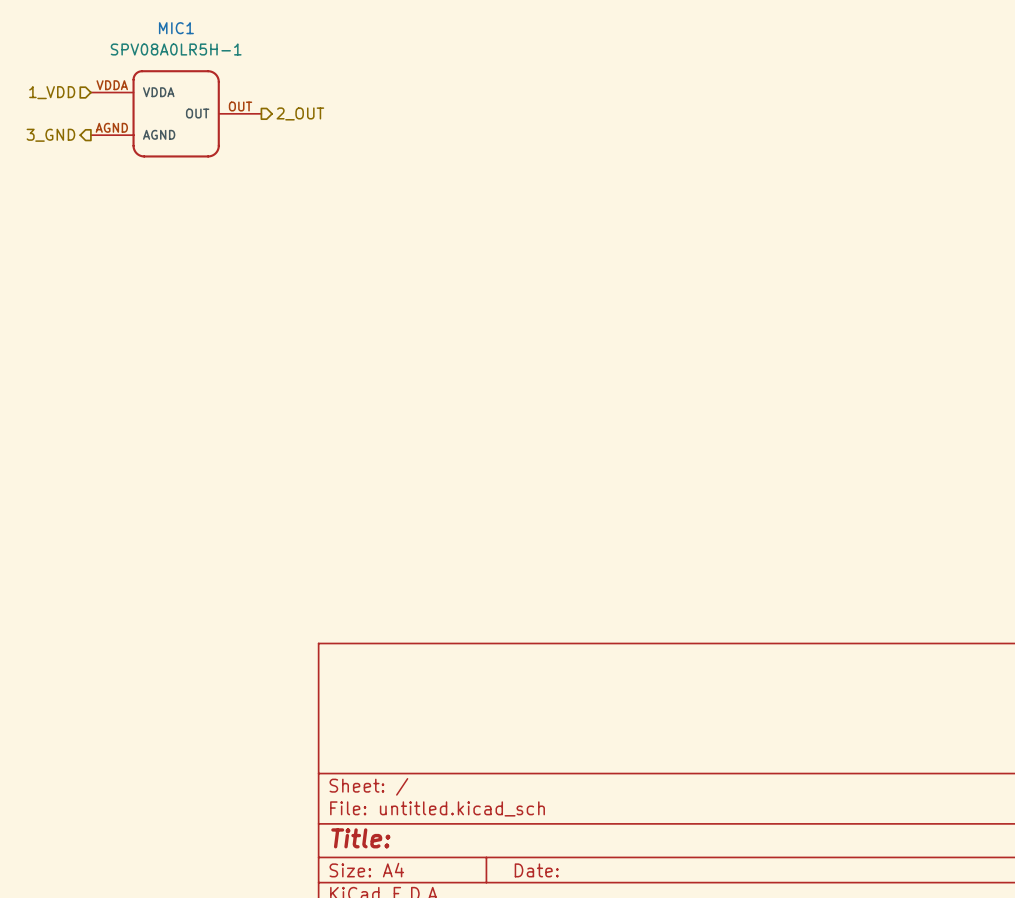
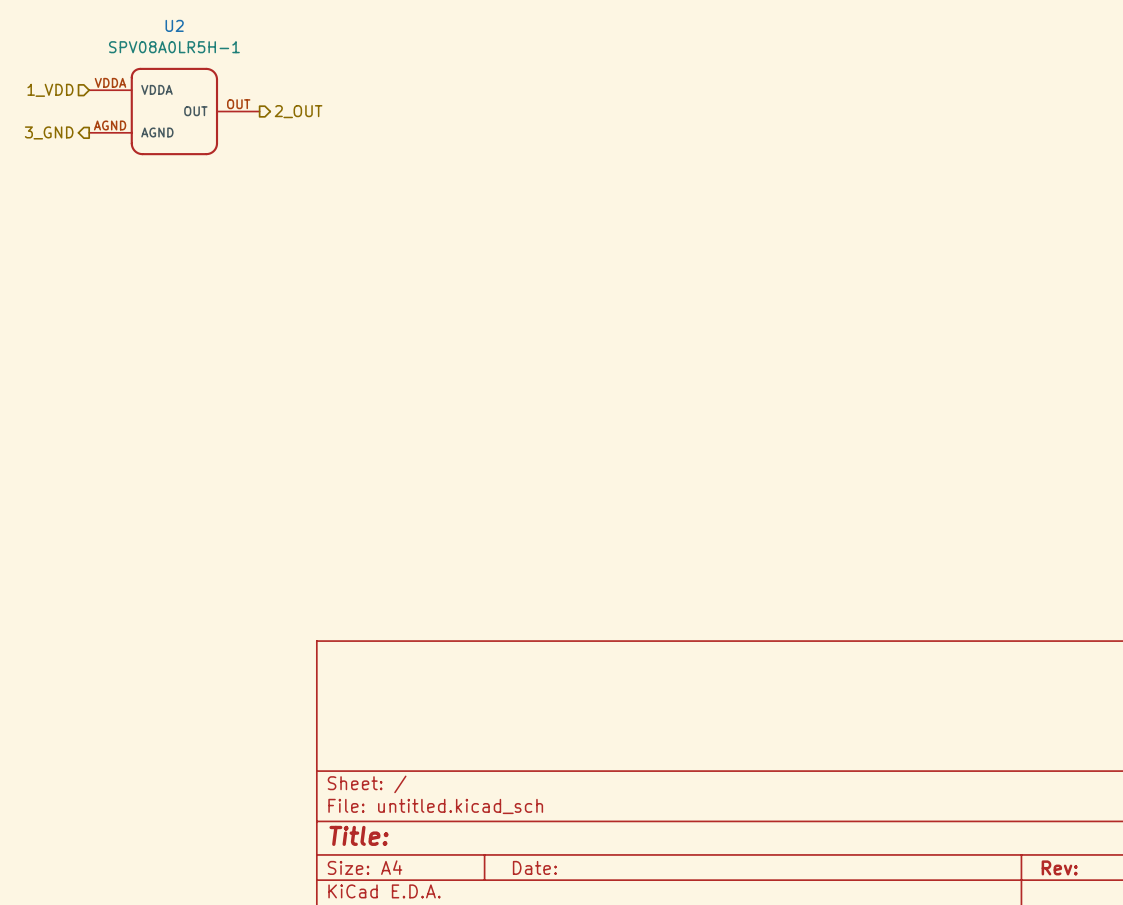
MIC1 name: MIC1 (176, 28) -> U2 (174, 25)

